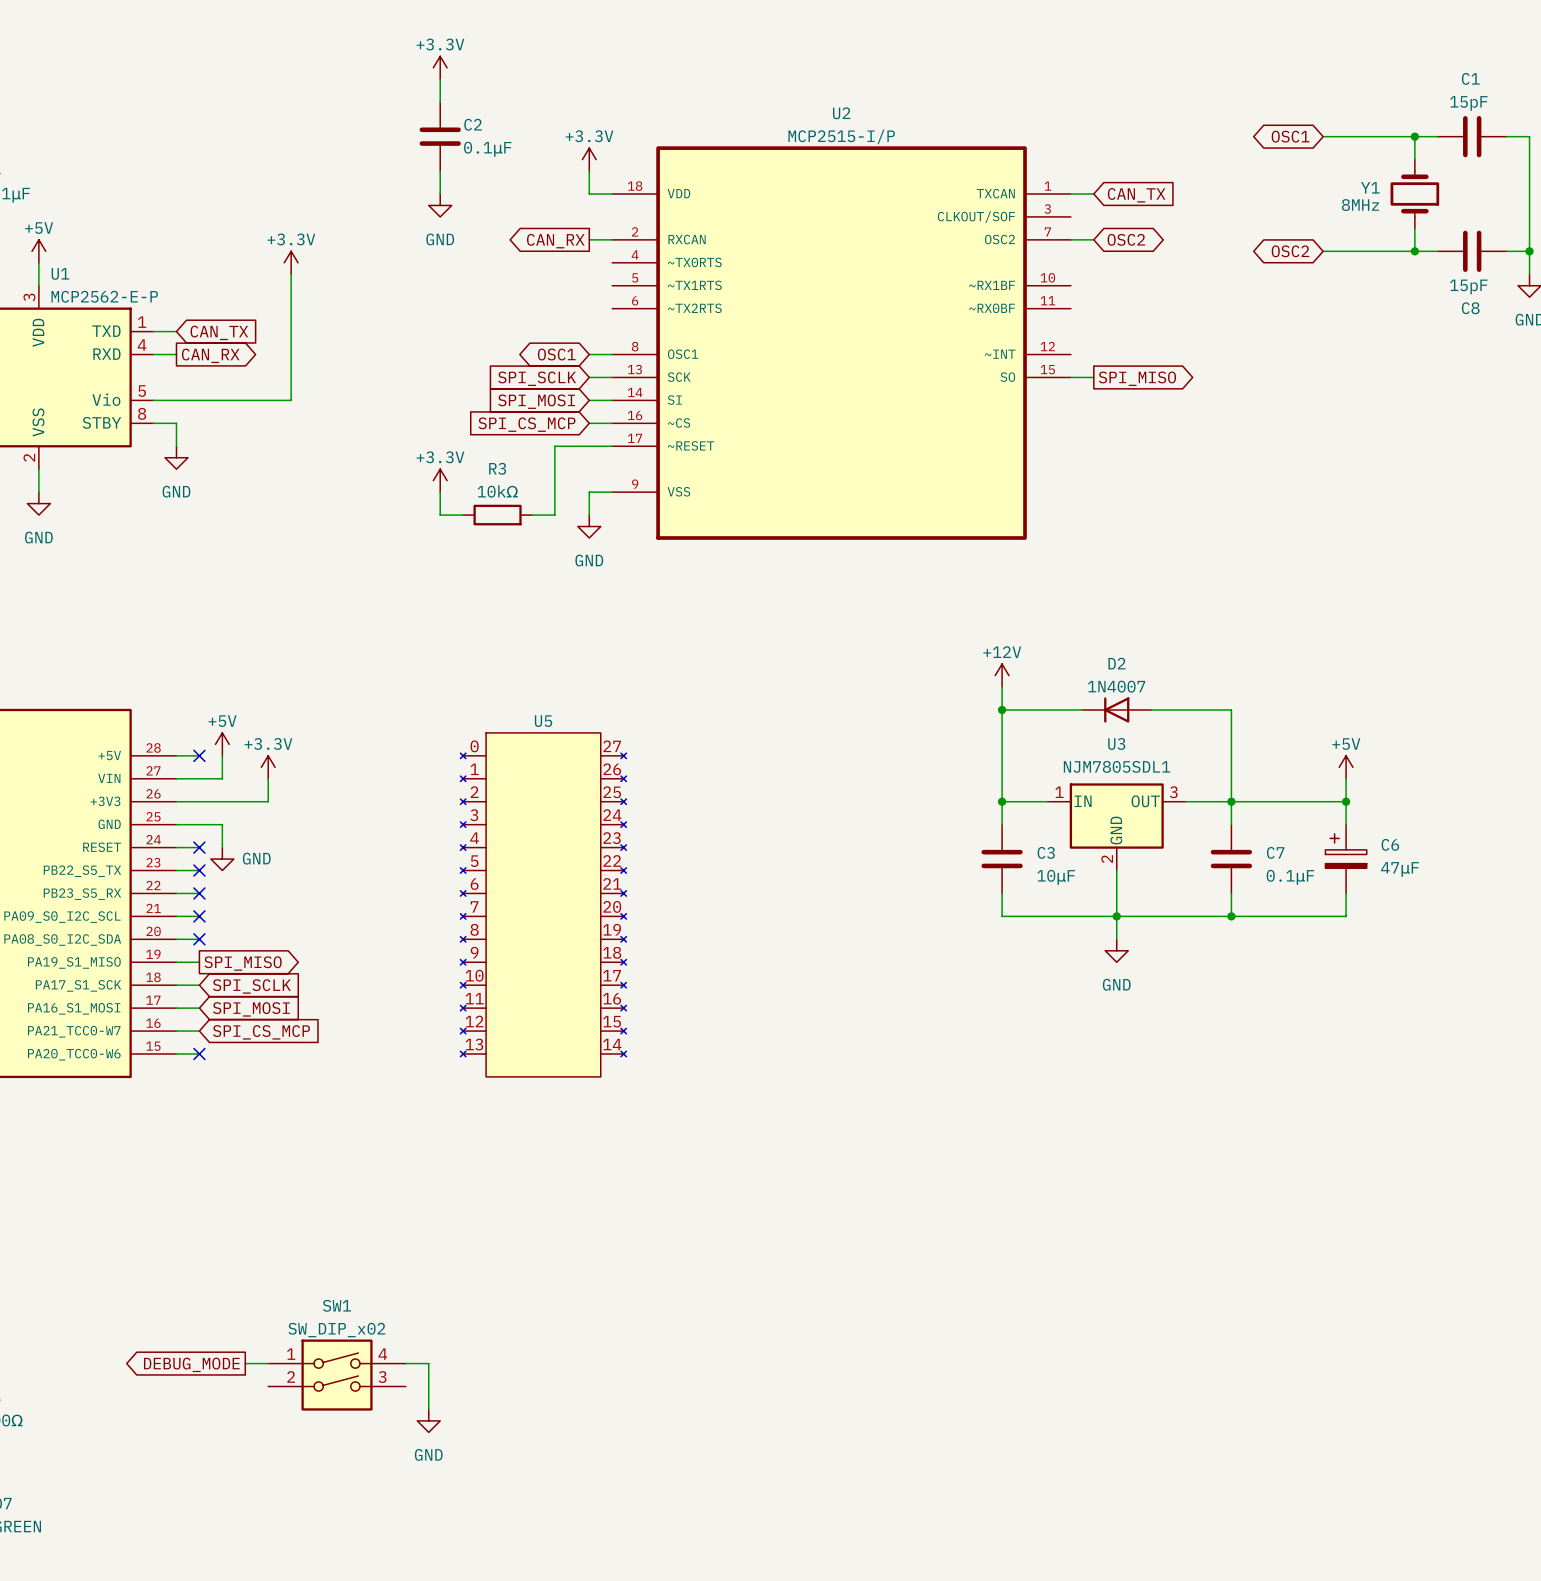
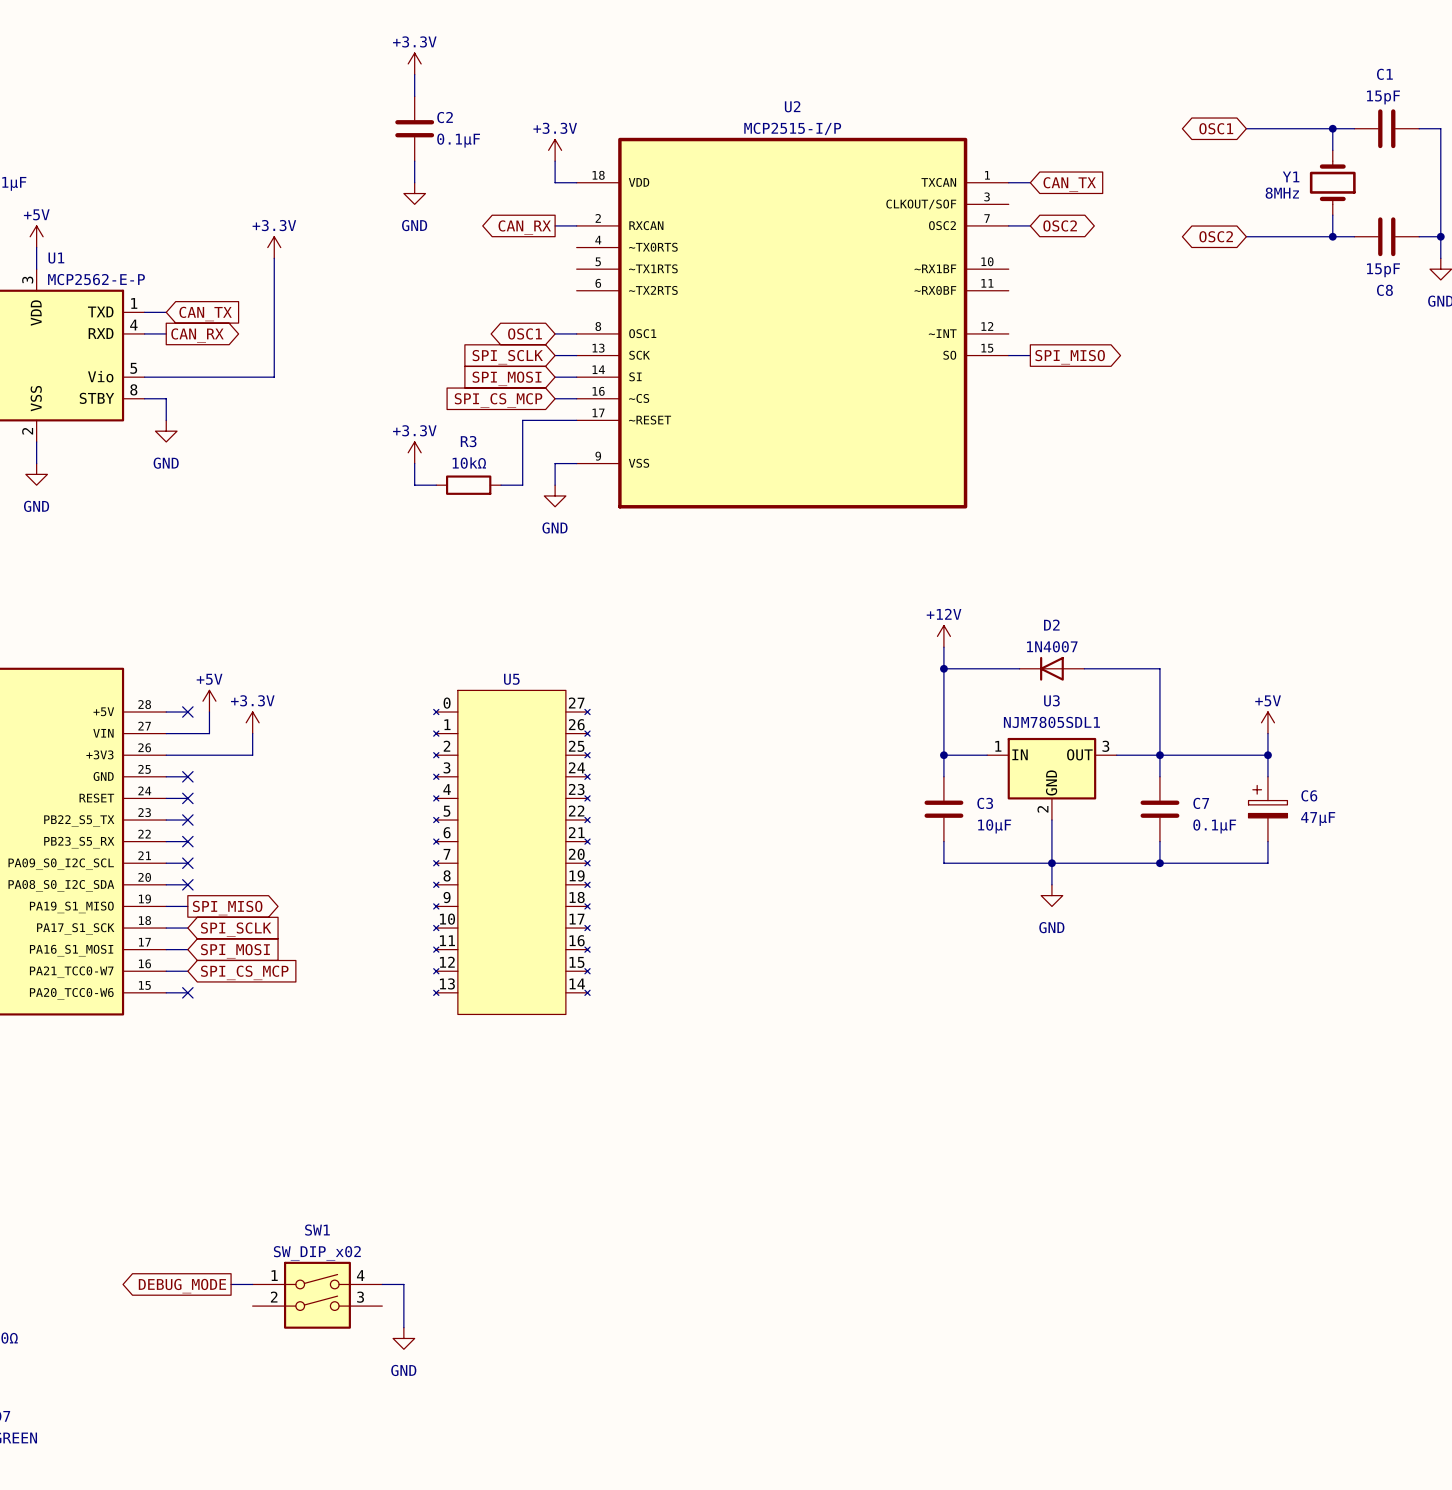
wire: (199, 824) (222, 824) (222, 847) -> none
no-connect mark: none -> (187, 776)
power symbol: GND (222, 859) -> none

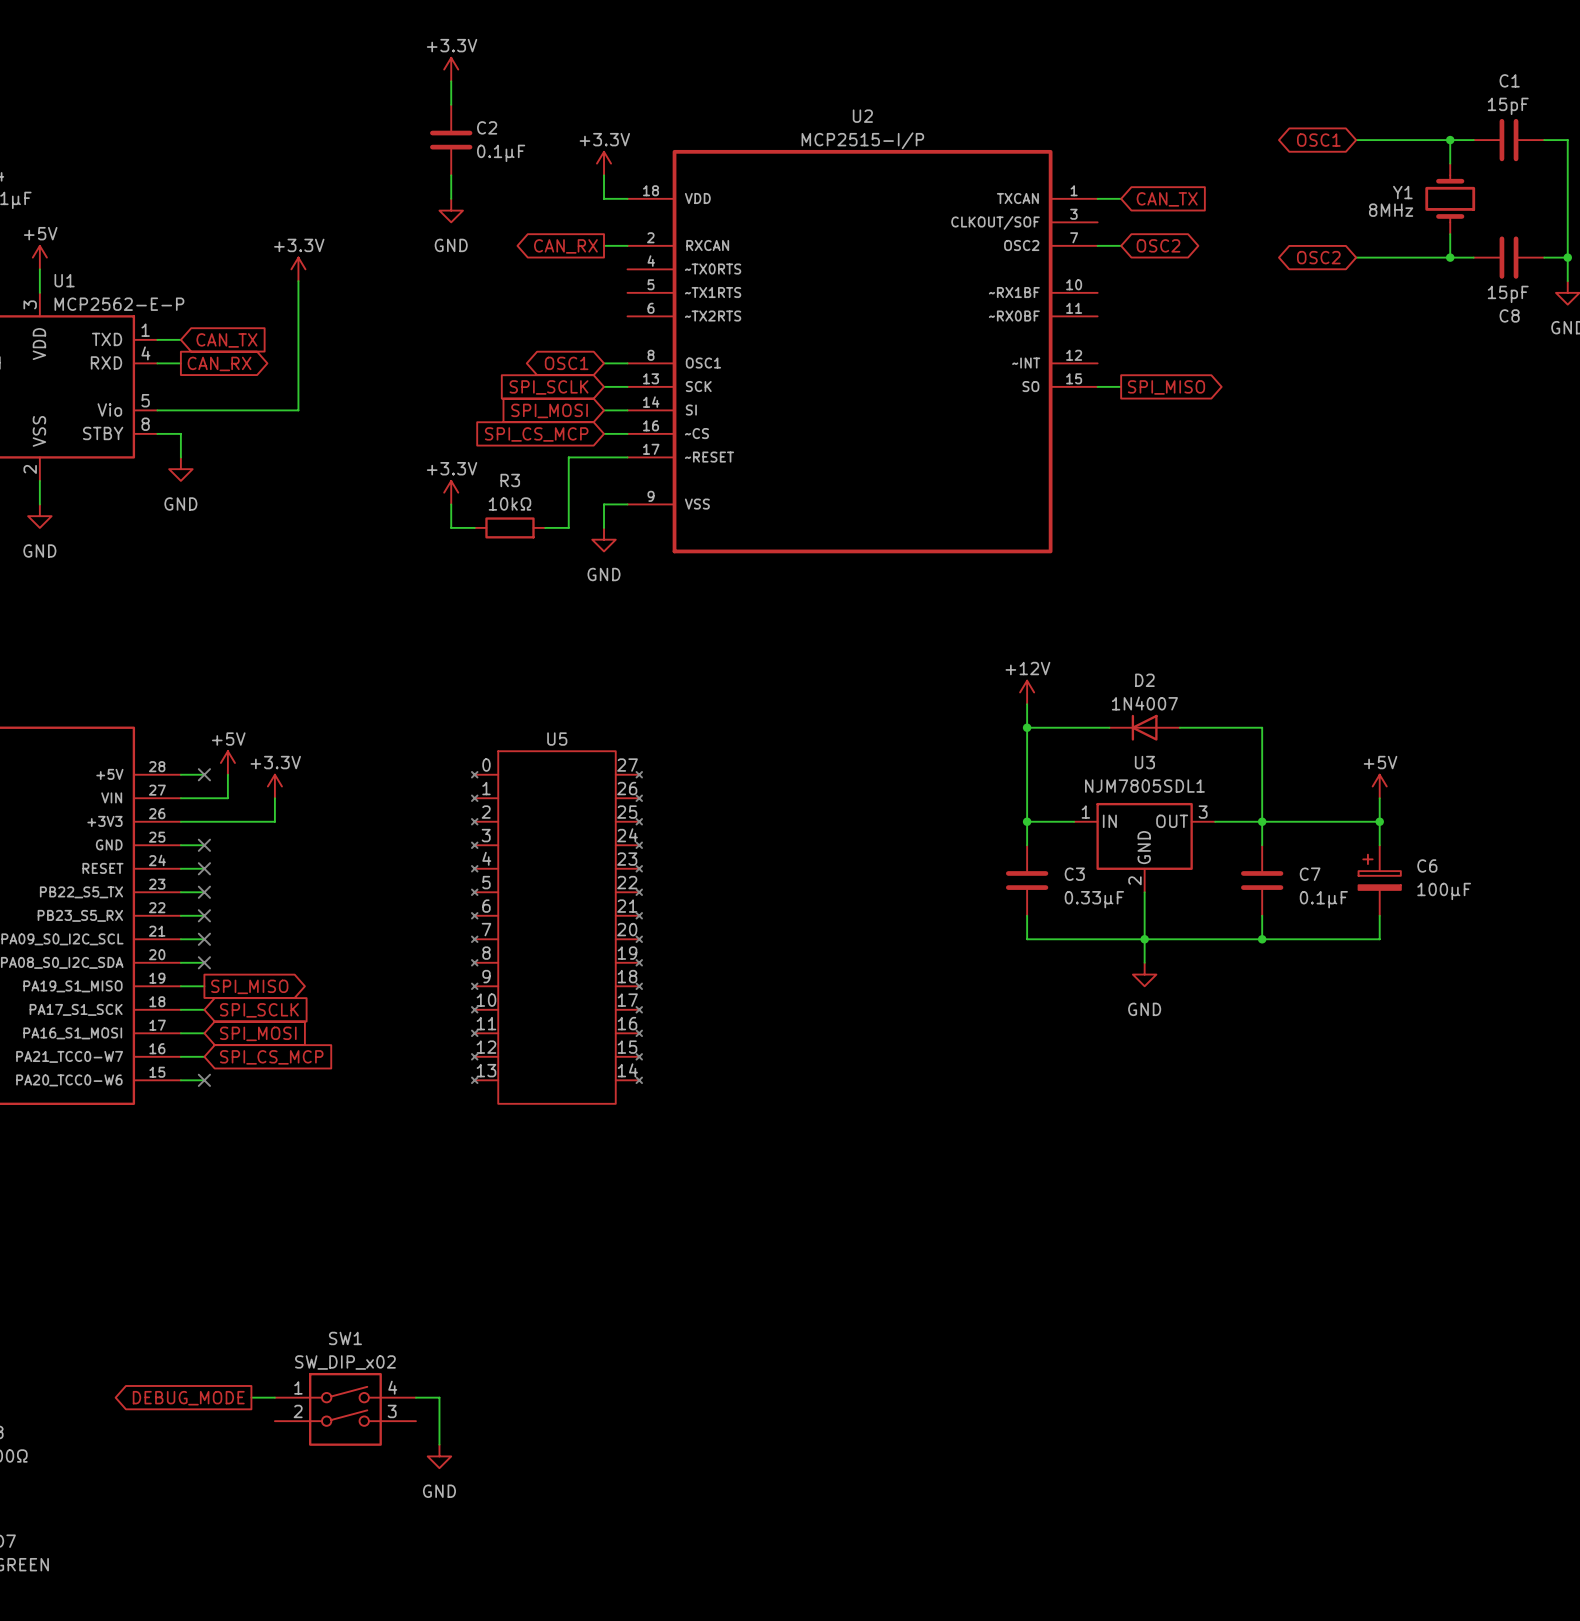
C6 value: 47μF (1318, 819) -> 100μF (1444, 891)
C3 value: 10μF (994, 826) -> 0.33μF (1094, 899)

